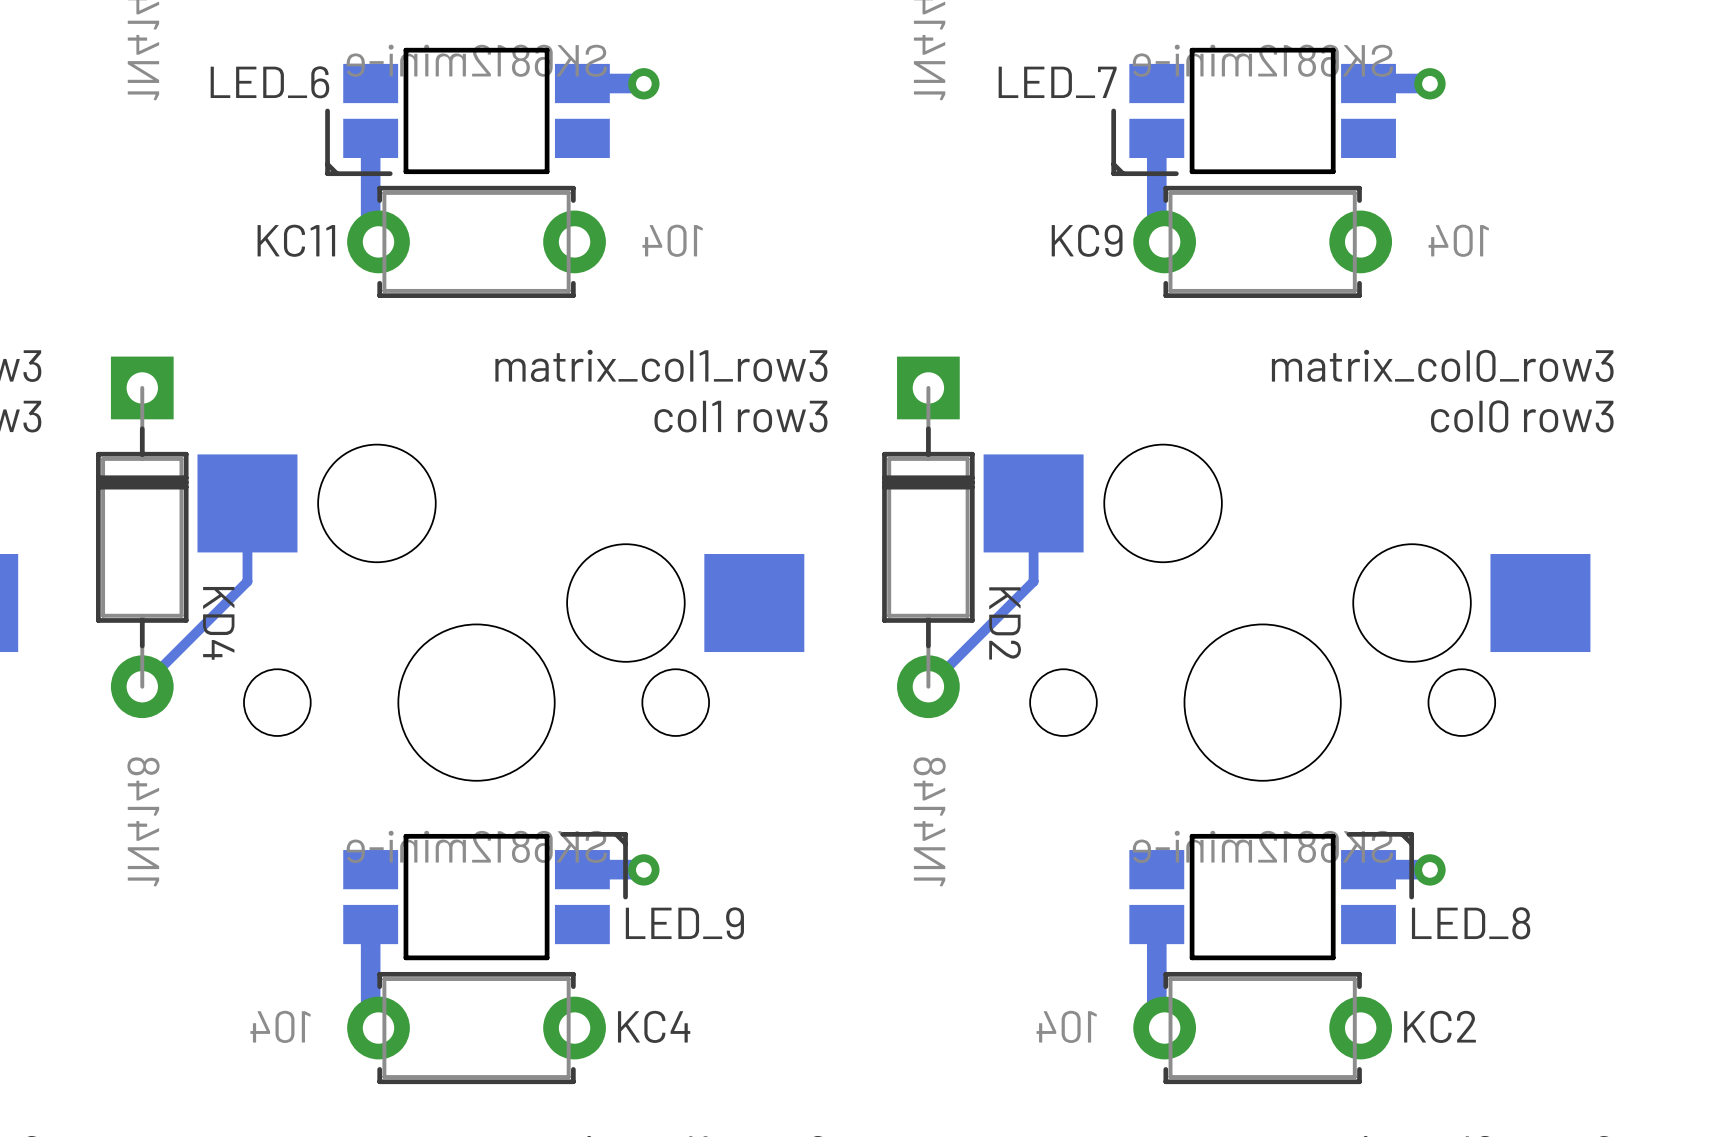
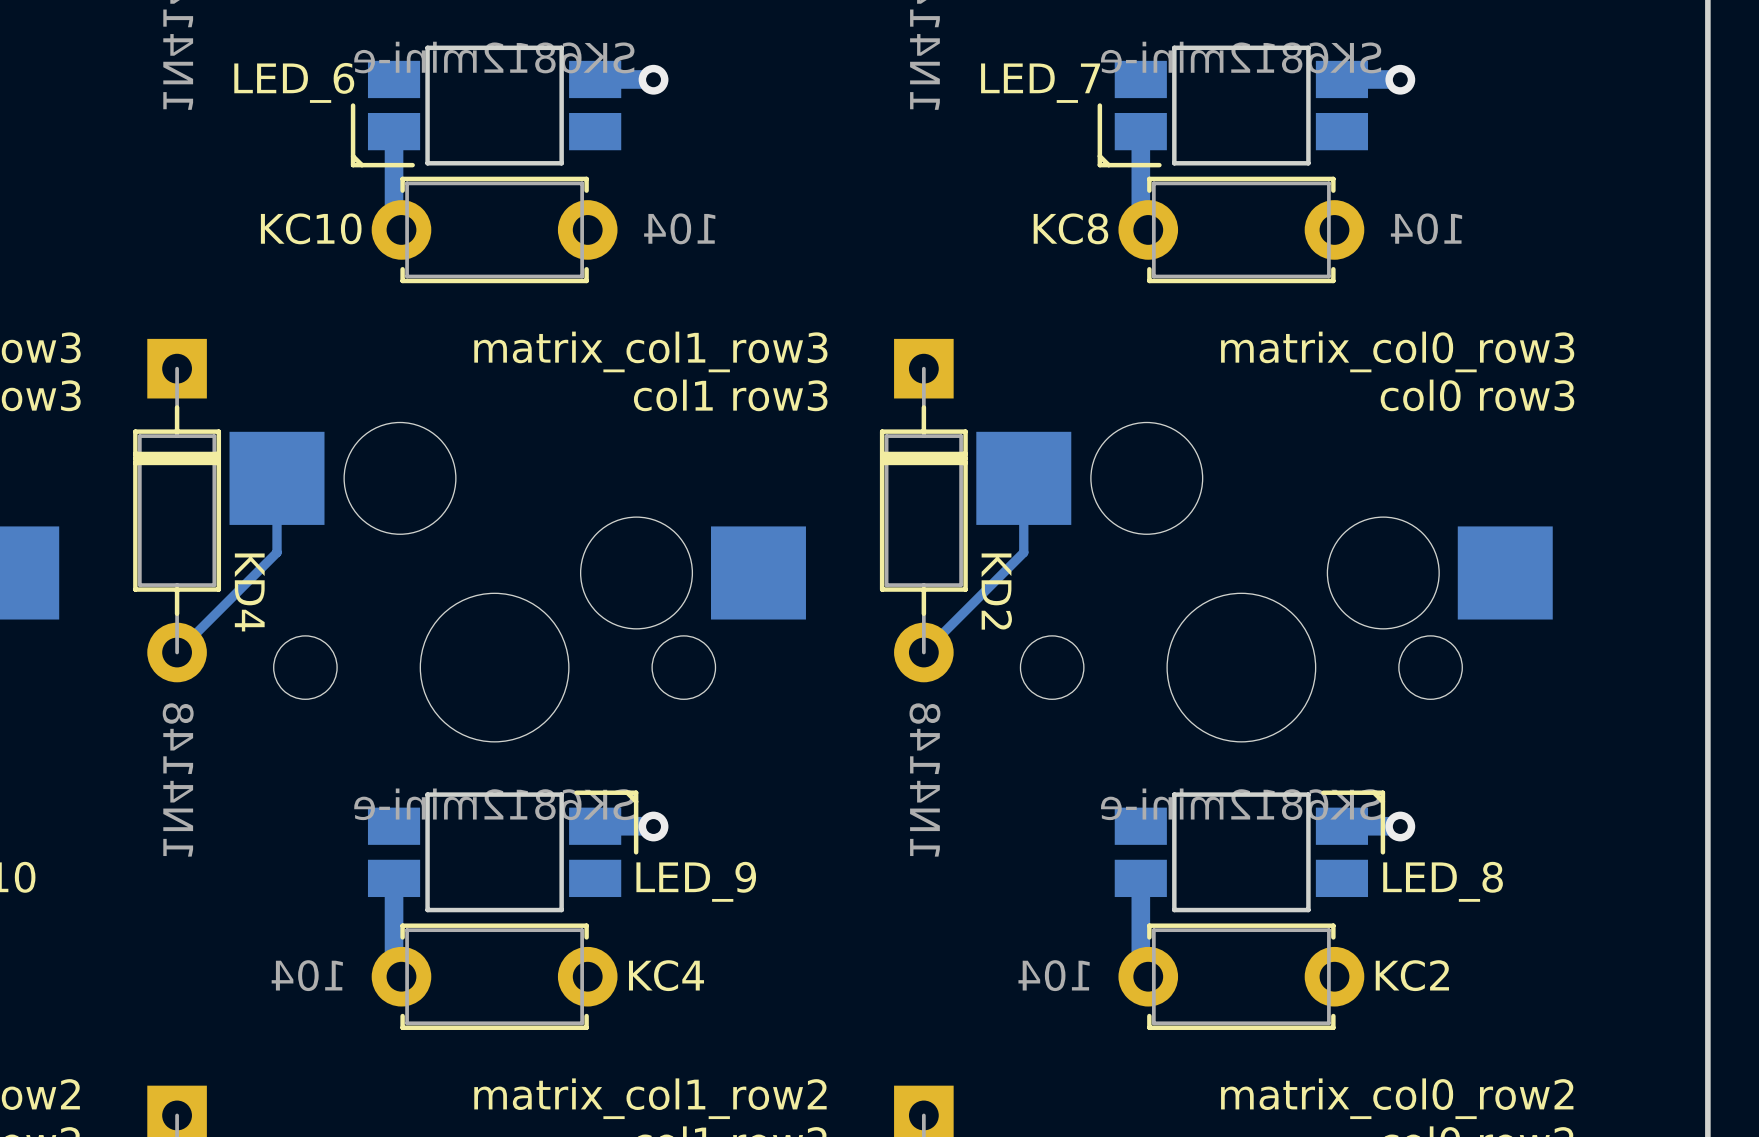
KC11 name: KC11 (296, 240) -> KC10 (311, 228)
KC9 name: KC9 (1087, 240) -> KC8 (1070, 228)

